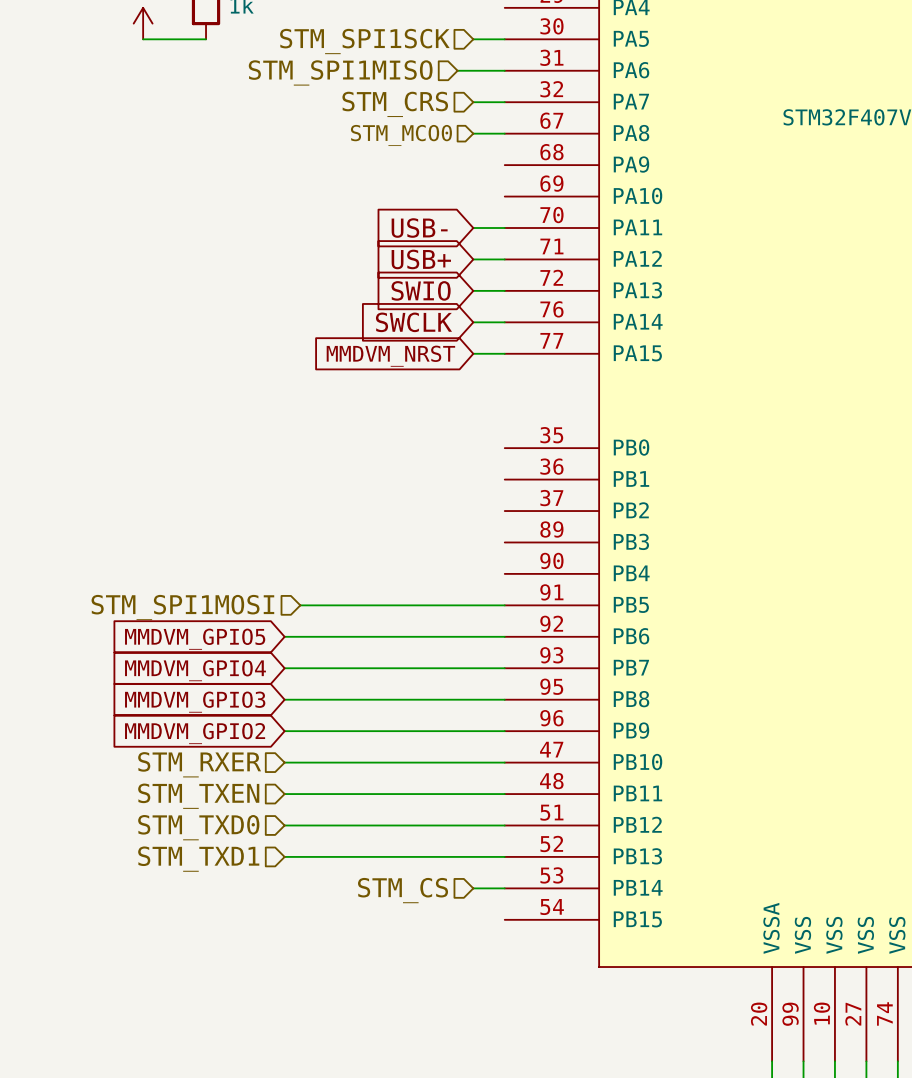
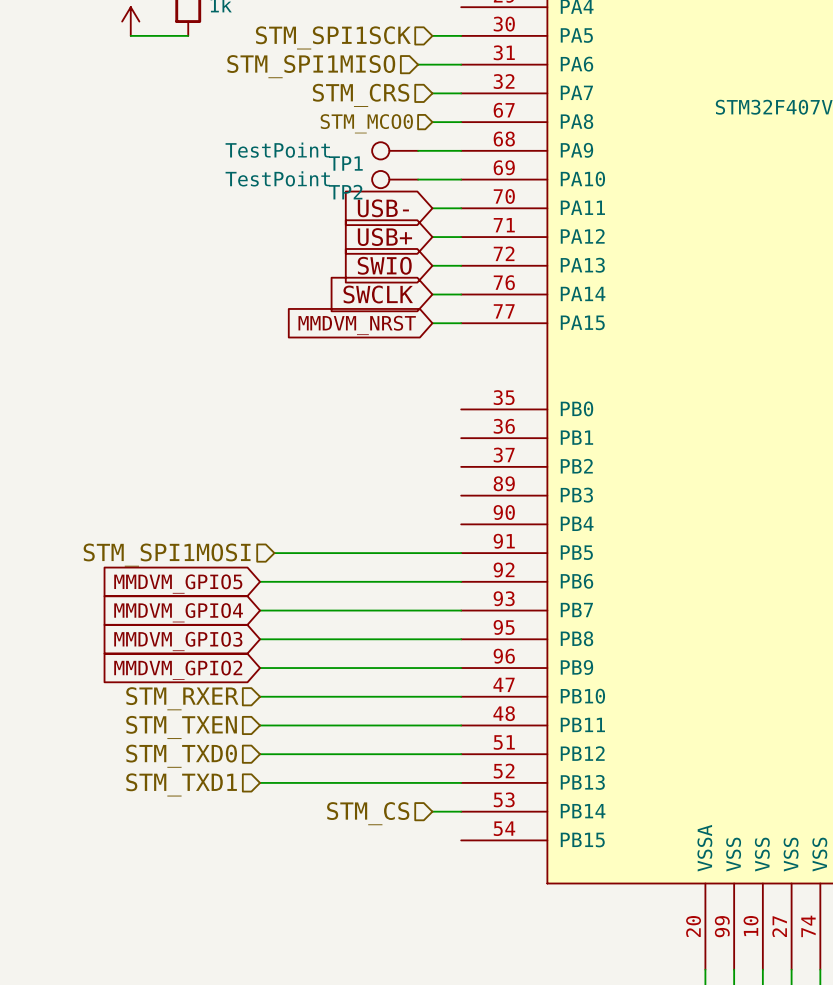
TP1: none -> TestPoint (395, 150)
wire: none -> (418, 150) (461, 150)
TP2: none -> TestPoint (395, 179)
wire: none -> (418, 179) (461, 179)

